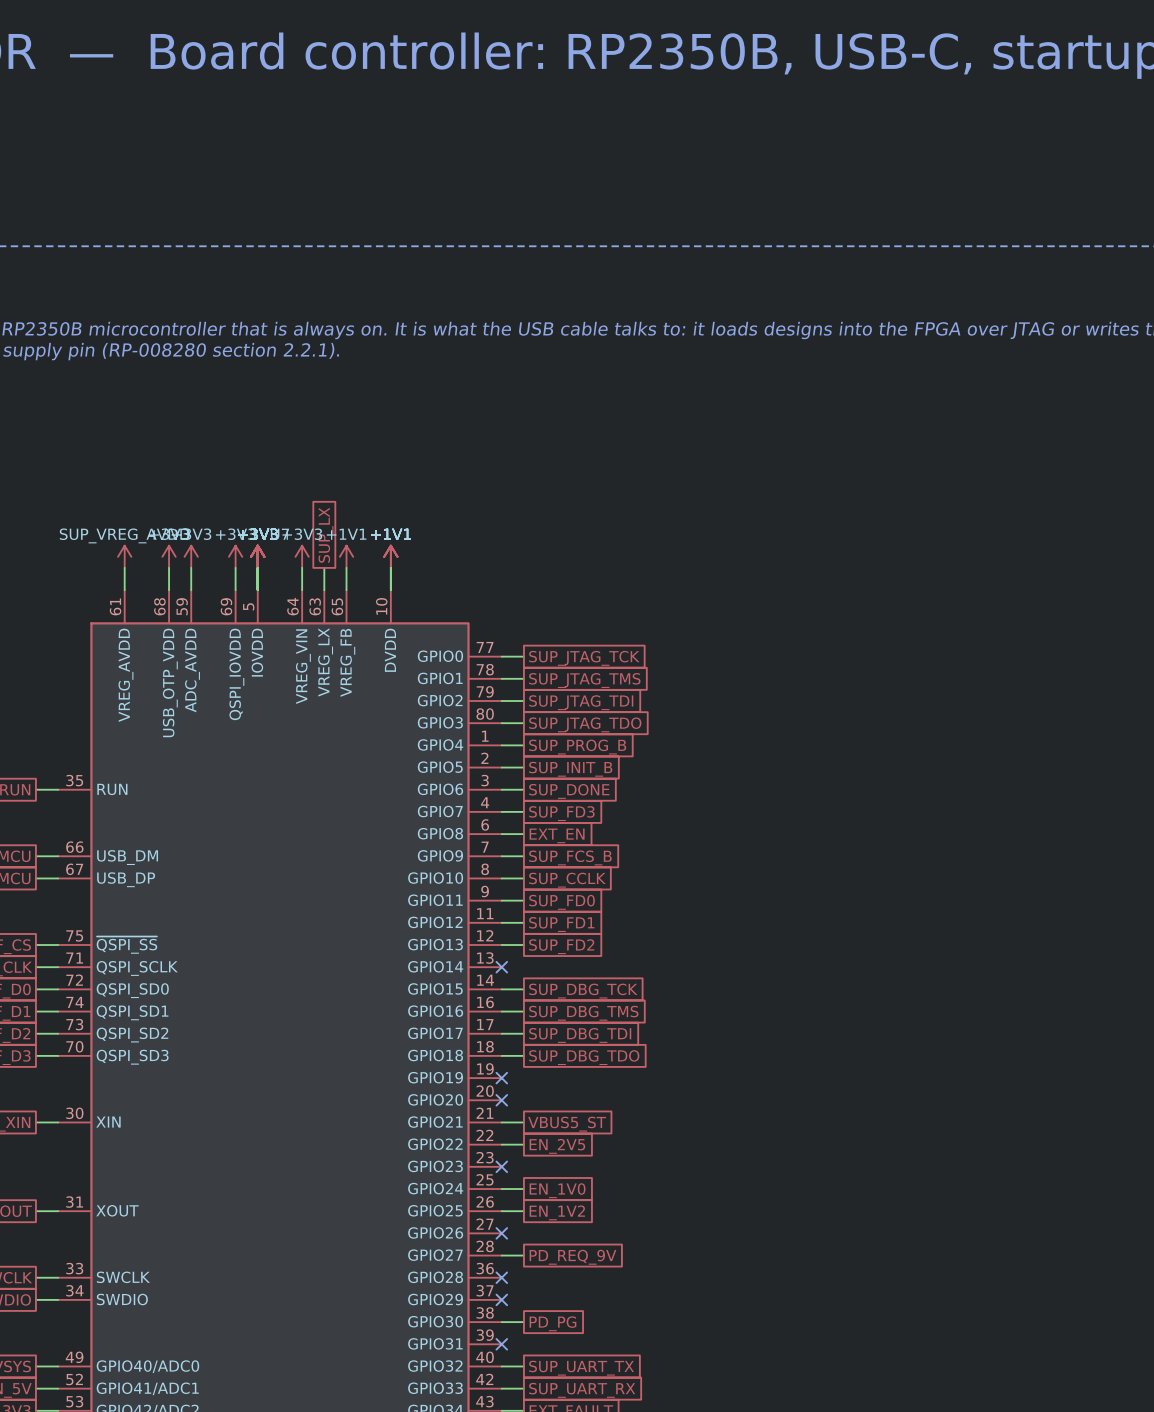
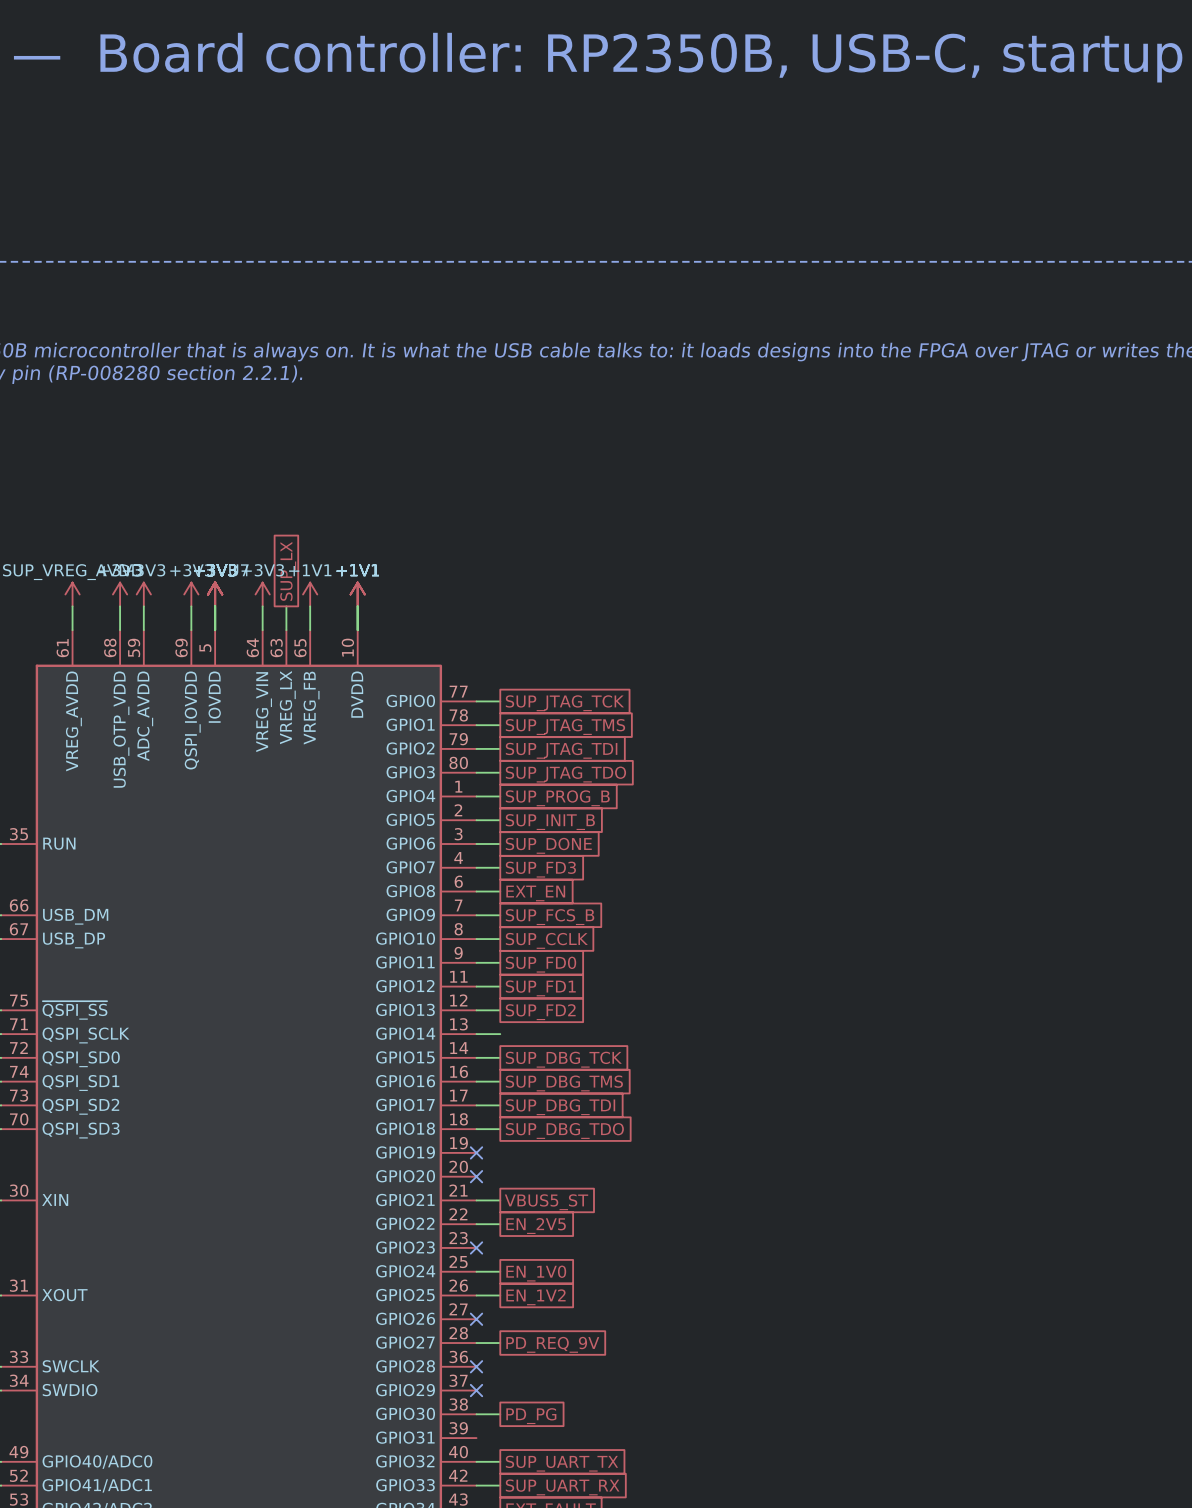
wire: none -> (476, 1034) (500, 1034)
no-connect mark: (501, 967) -> none
no-connect mark: (501, 1344) -> none

